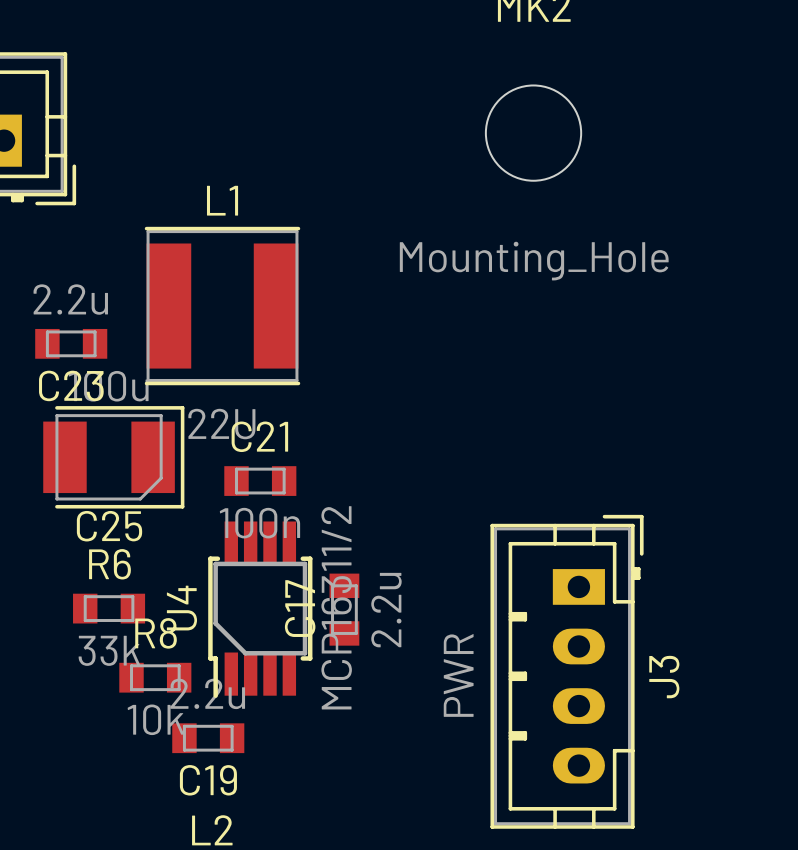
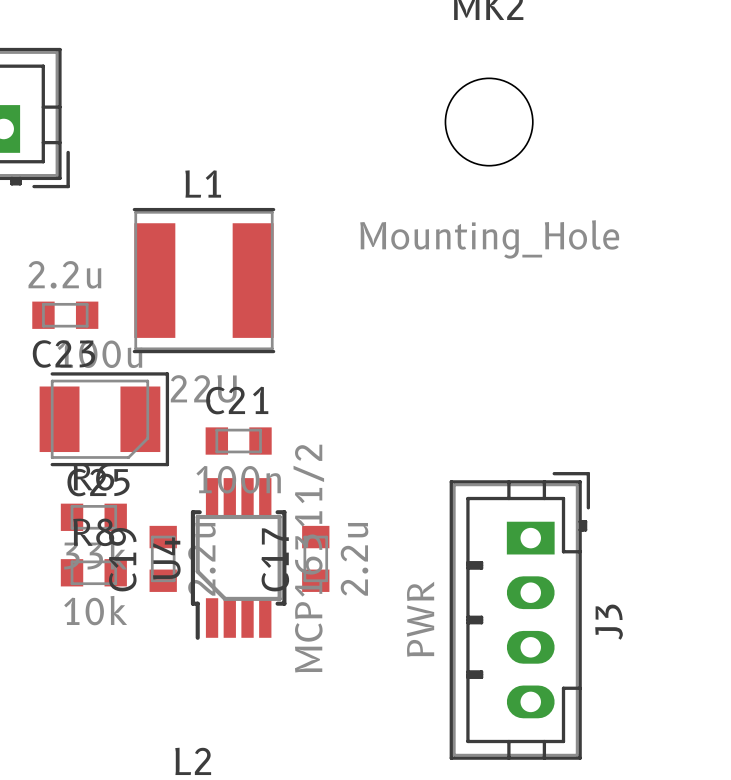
R6 position: (109, 608) -> (93, 517)
R8 position: (155, 677) -> (93, 572)
C19 rotation: 0° (208, 738) -> 90° clockwise (163, 558)
C19 position: (208, 738) -> (163, 558)

